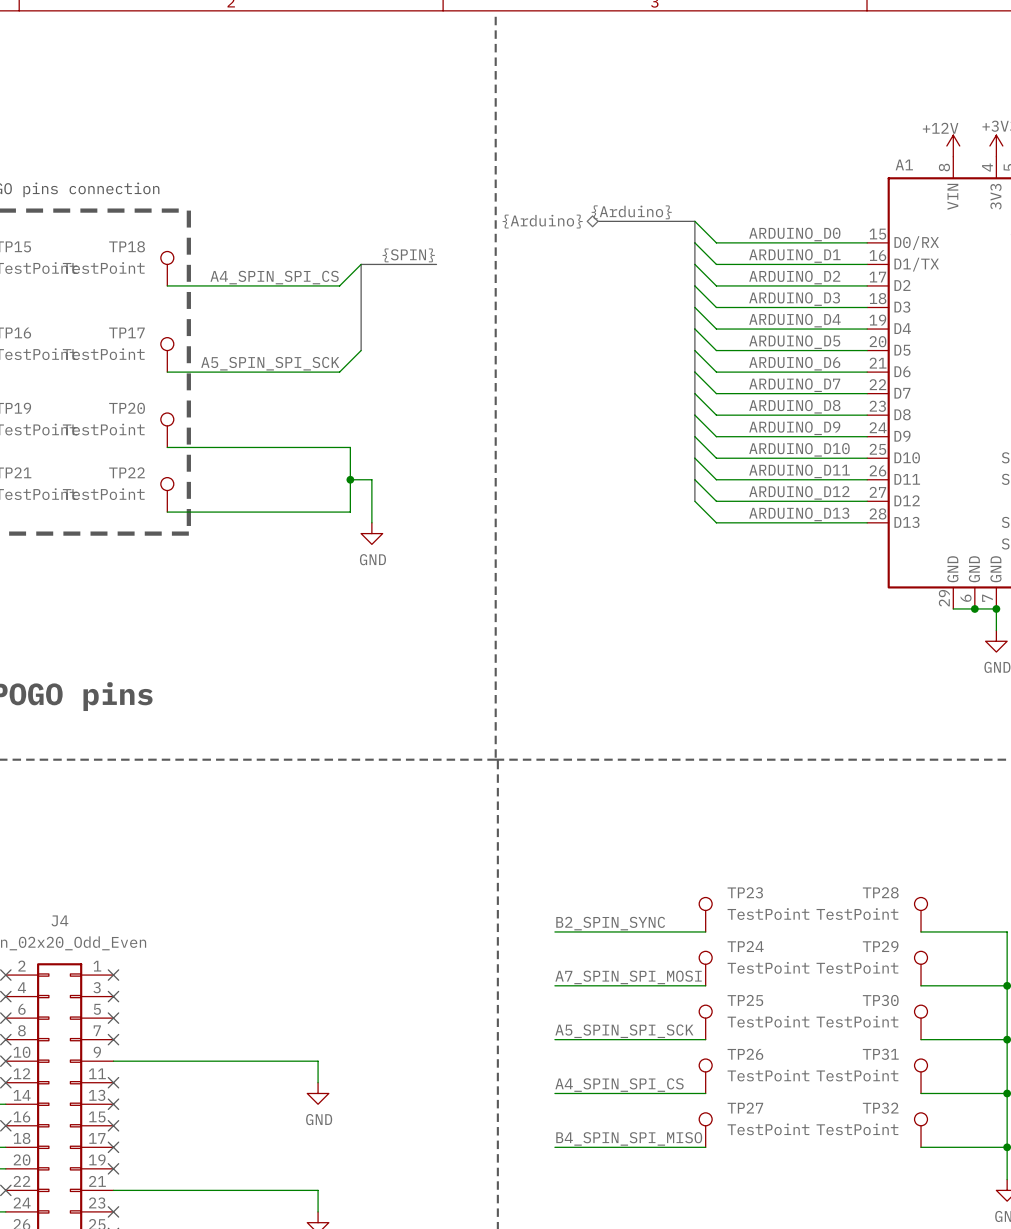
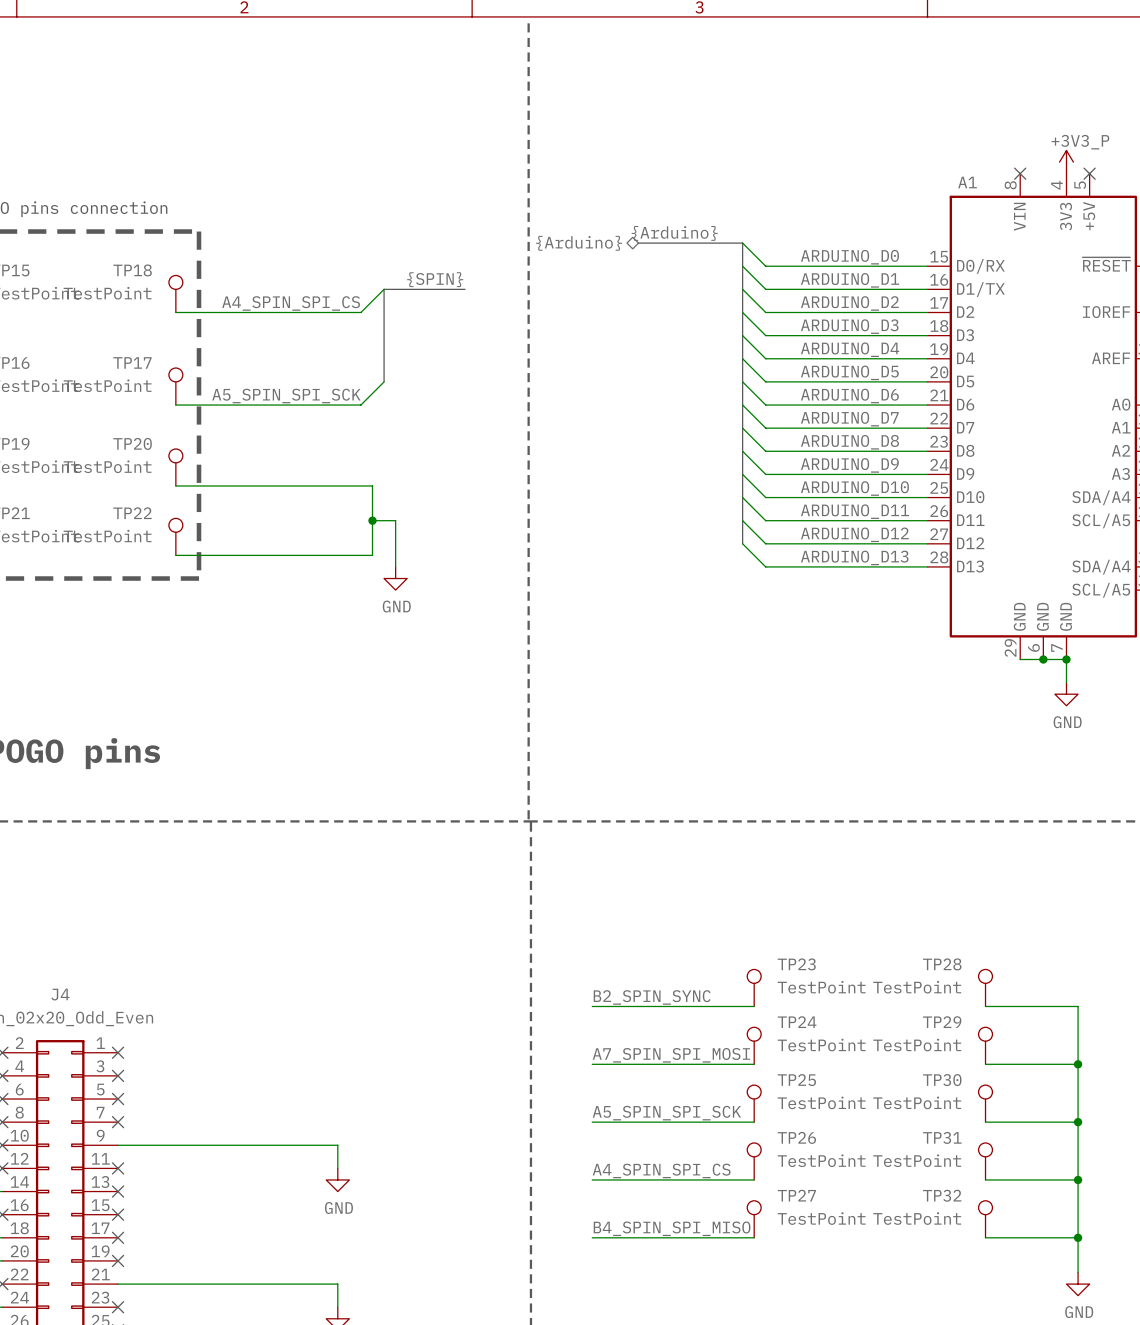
power symbol: +12V (953, 145) -> none
no-connect mark: none -> (1020, 173)

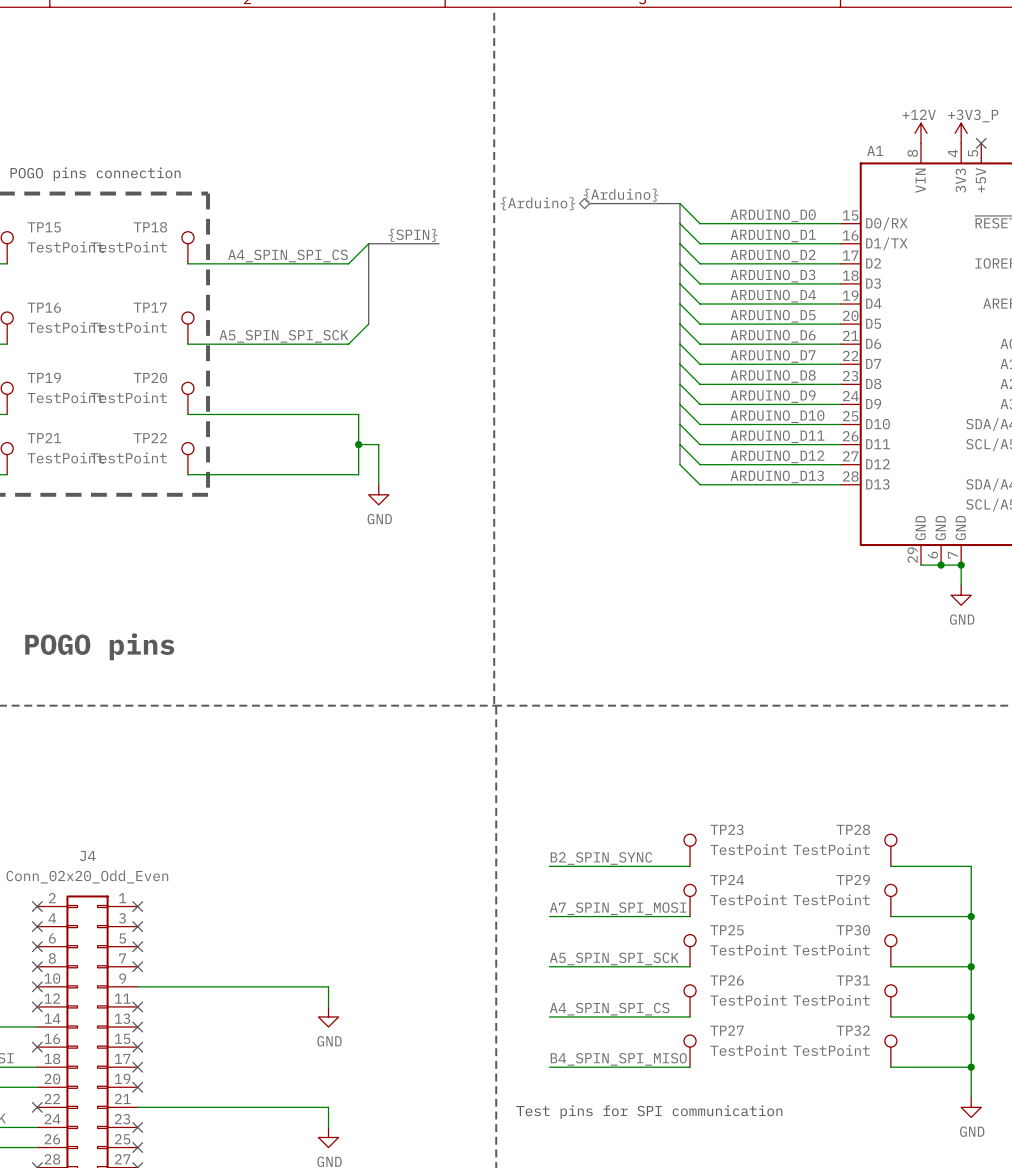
power symbol: none -> +12V (921, 133)
no-connect mark: (1020, 173) -> none
text: none -> Test pins for SPI communication (649, 1112)

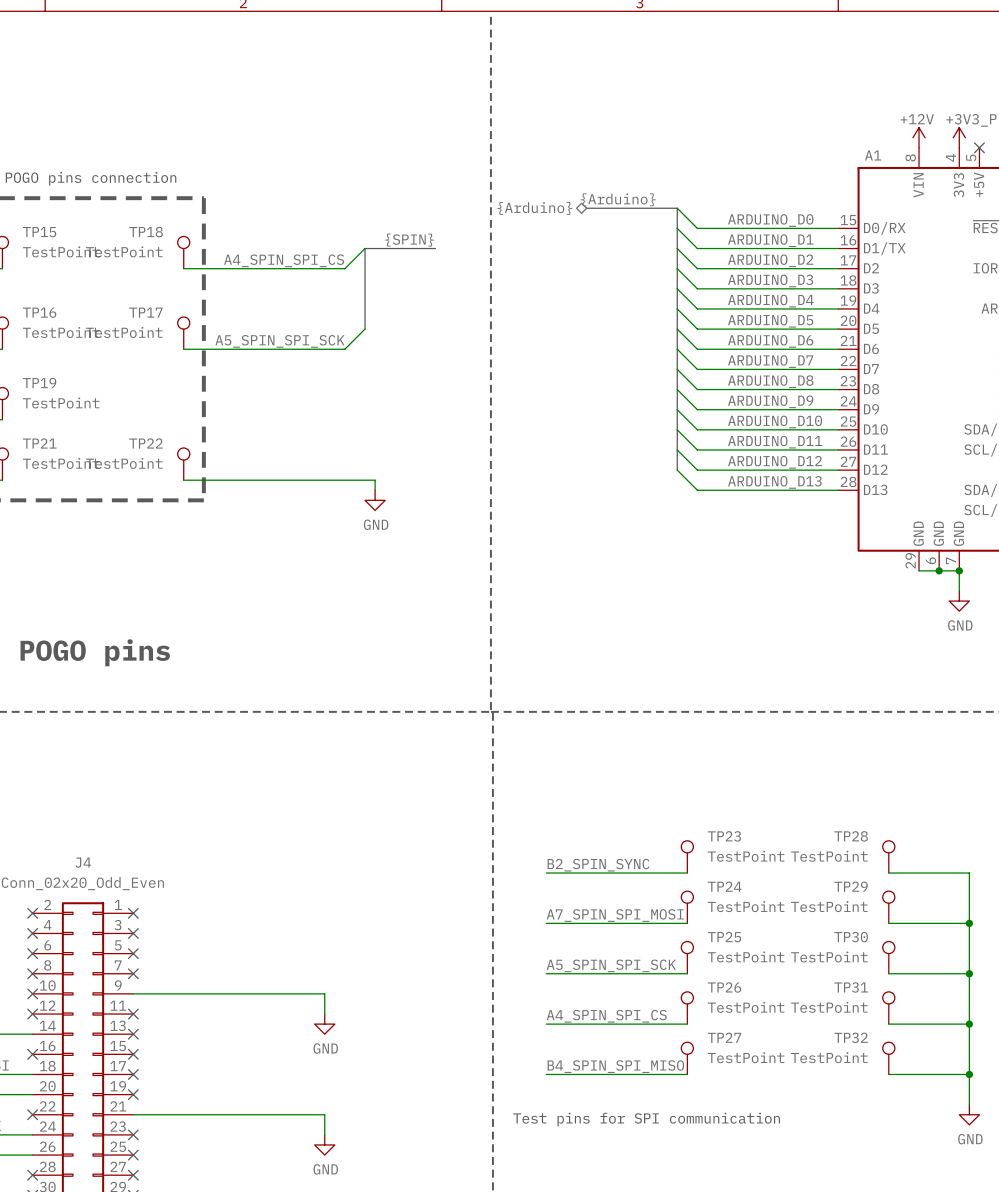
TP20: TestPoint (187, 398) -> none
wire: (187, 414) (358, 414) (358, 474) -> none
wire: (358, 444) (378, 444) (378, 474) -> (354, 480) (375, 480)
junction: (358, 444) -> none

